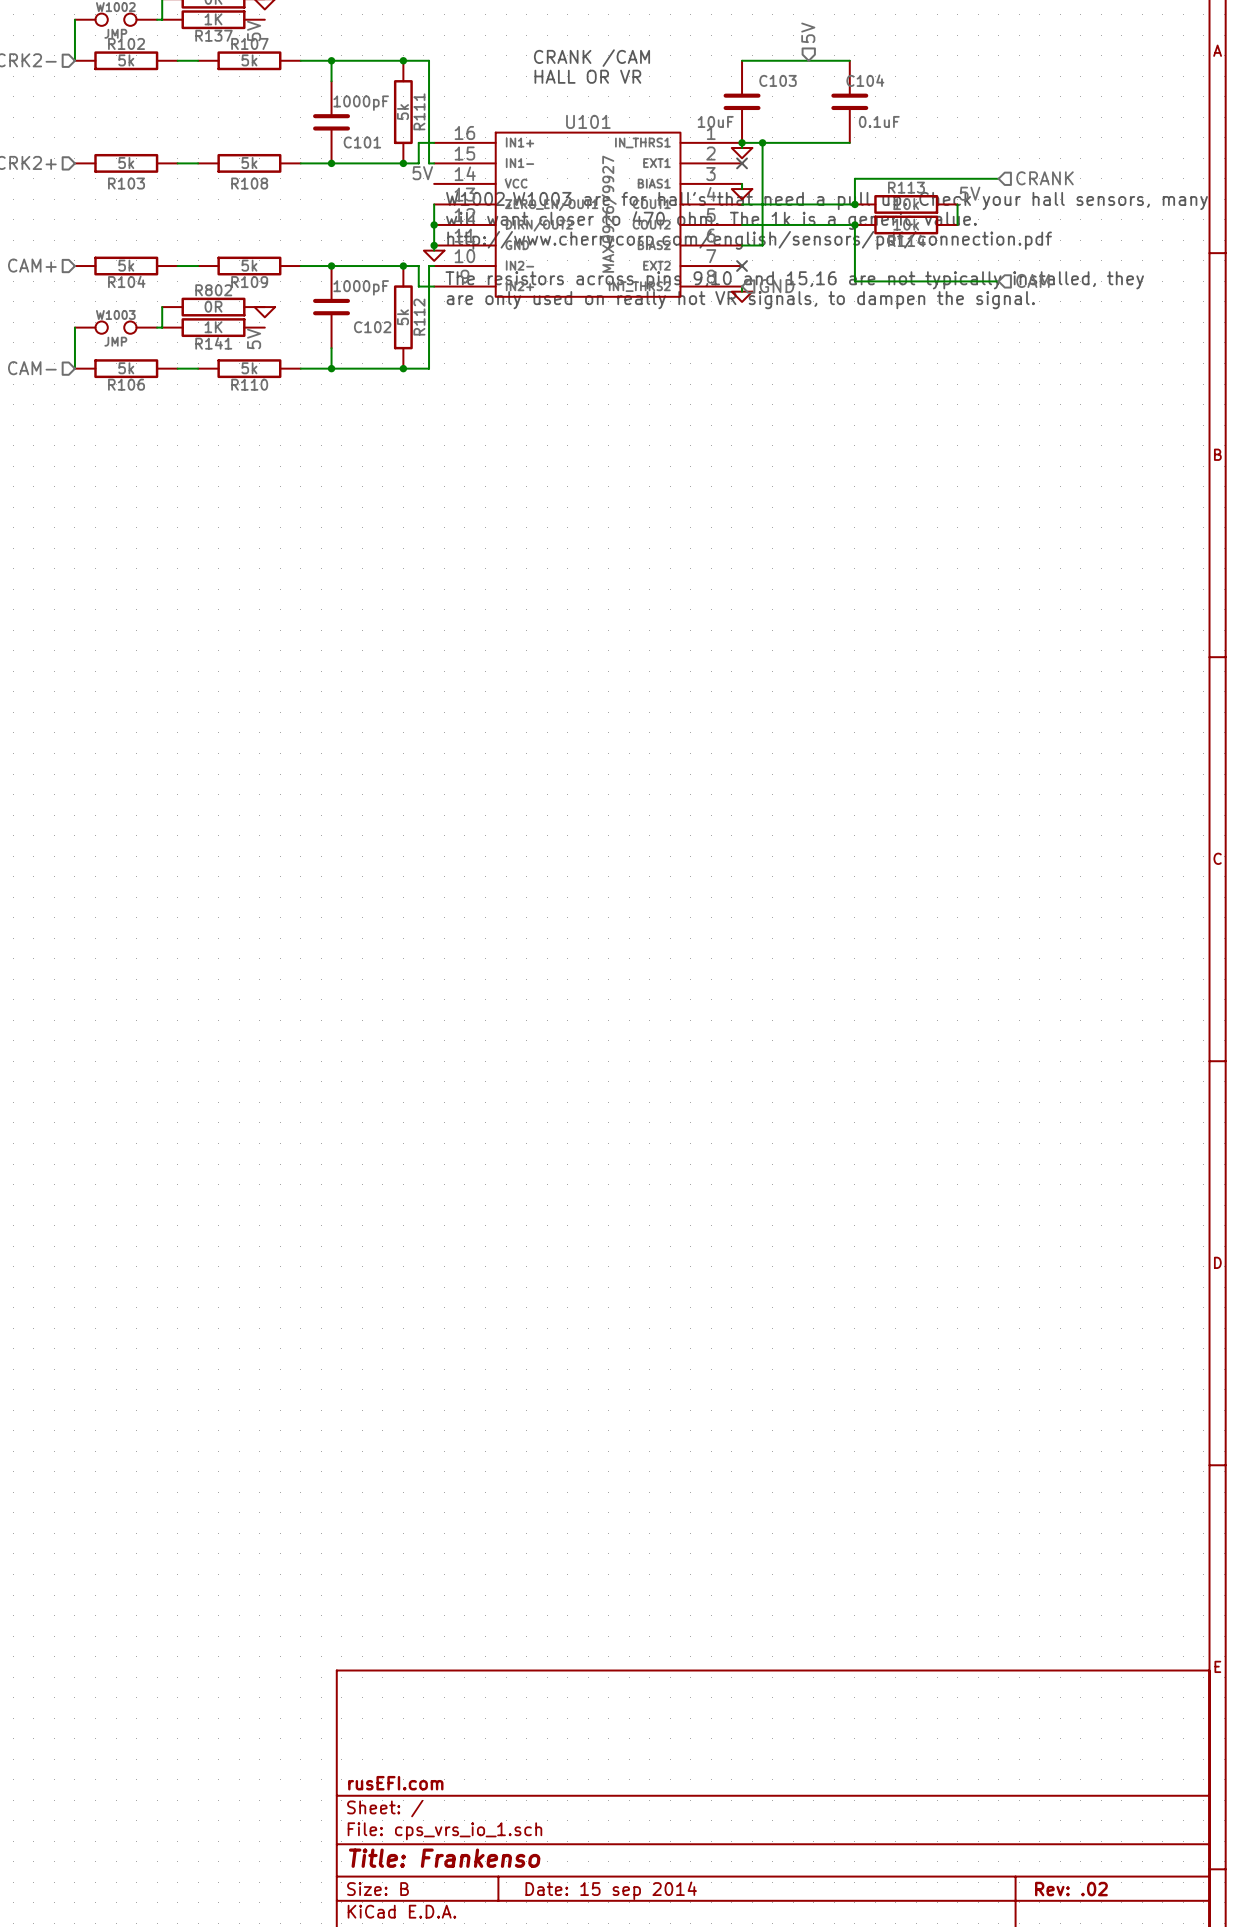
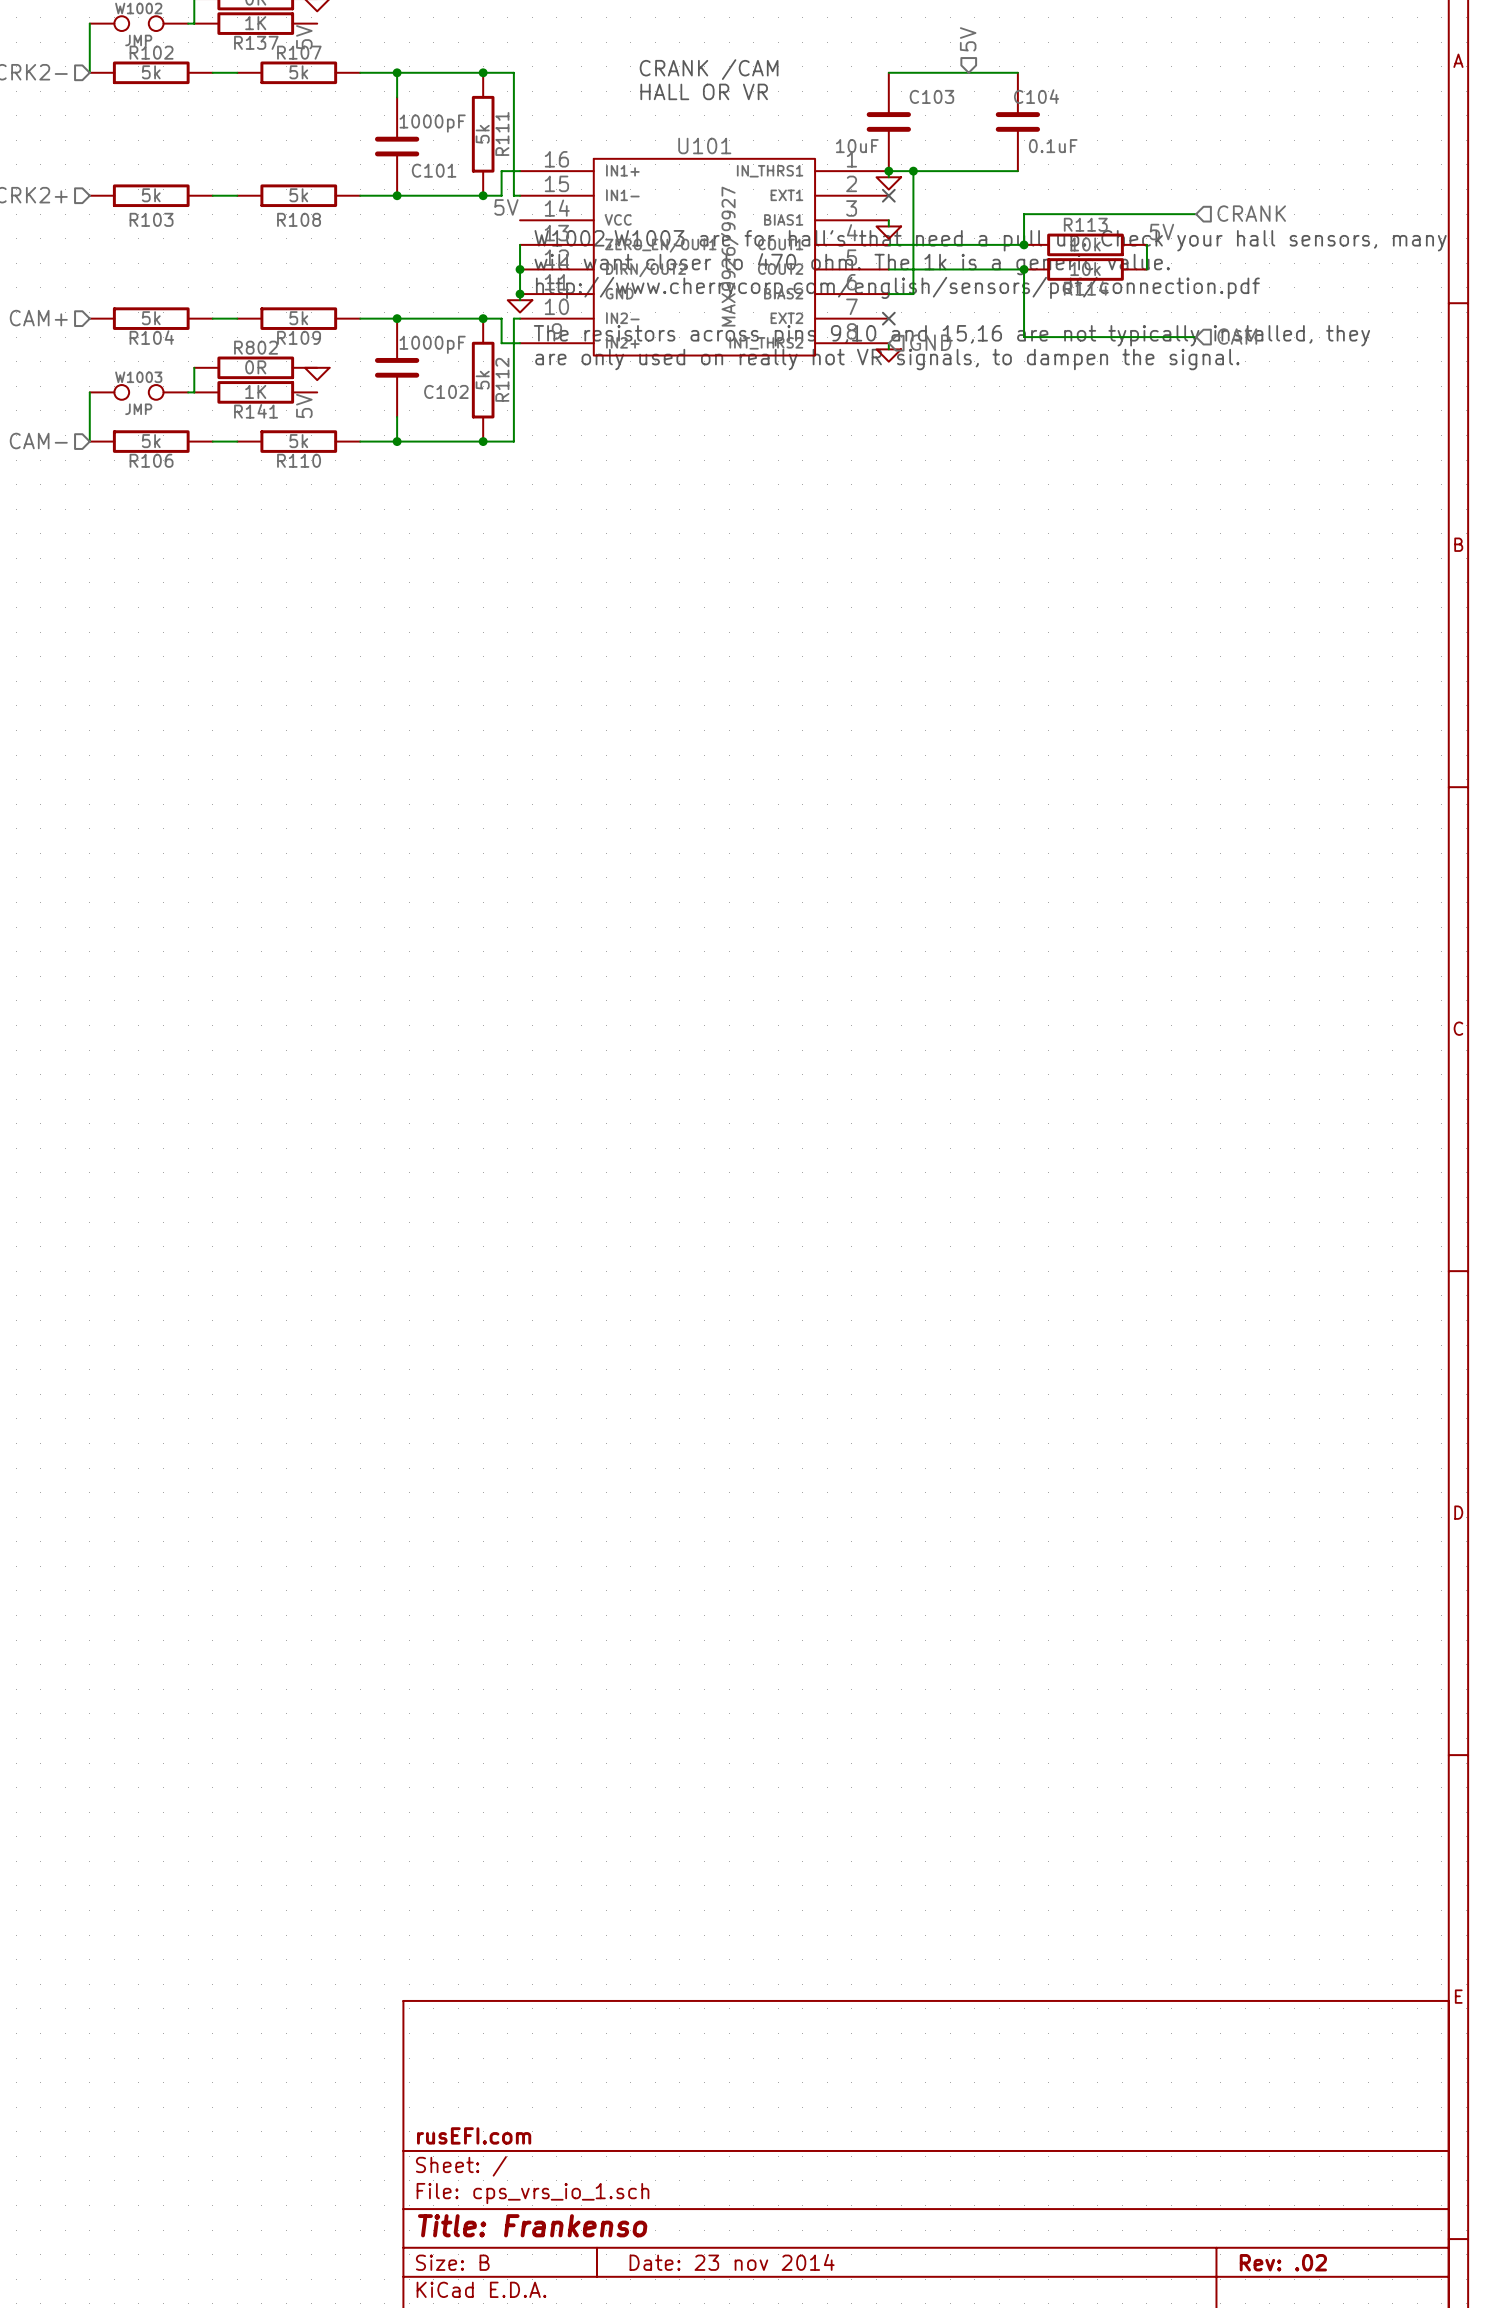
title block: Date: 15 sep 2014 (611, 1890) -> Date: 23 nov 2014 (732, 2262)

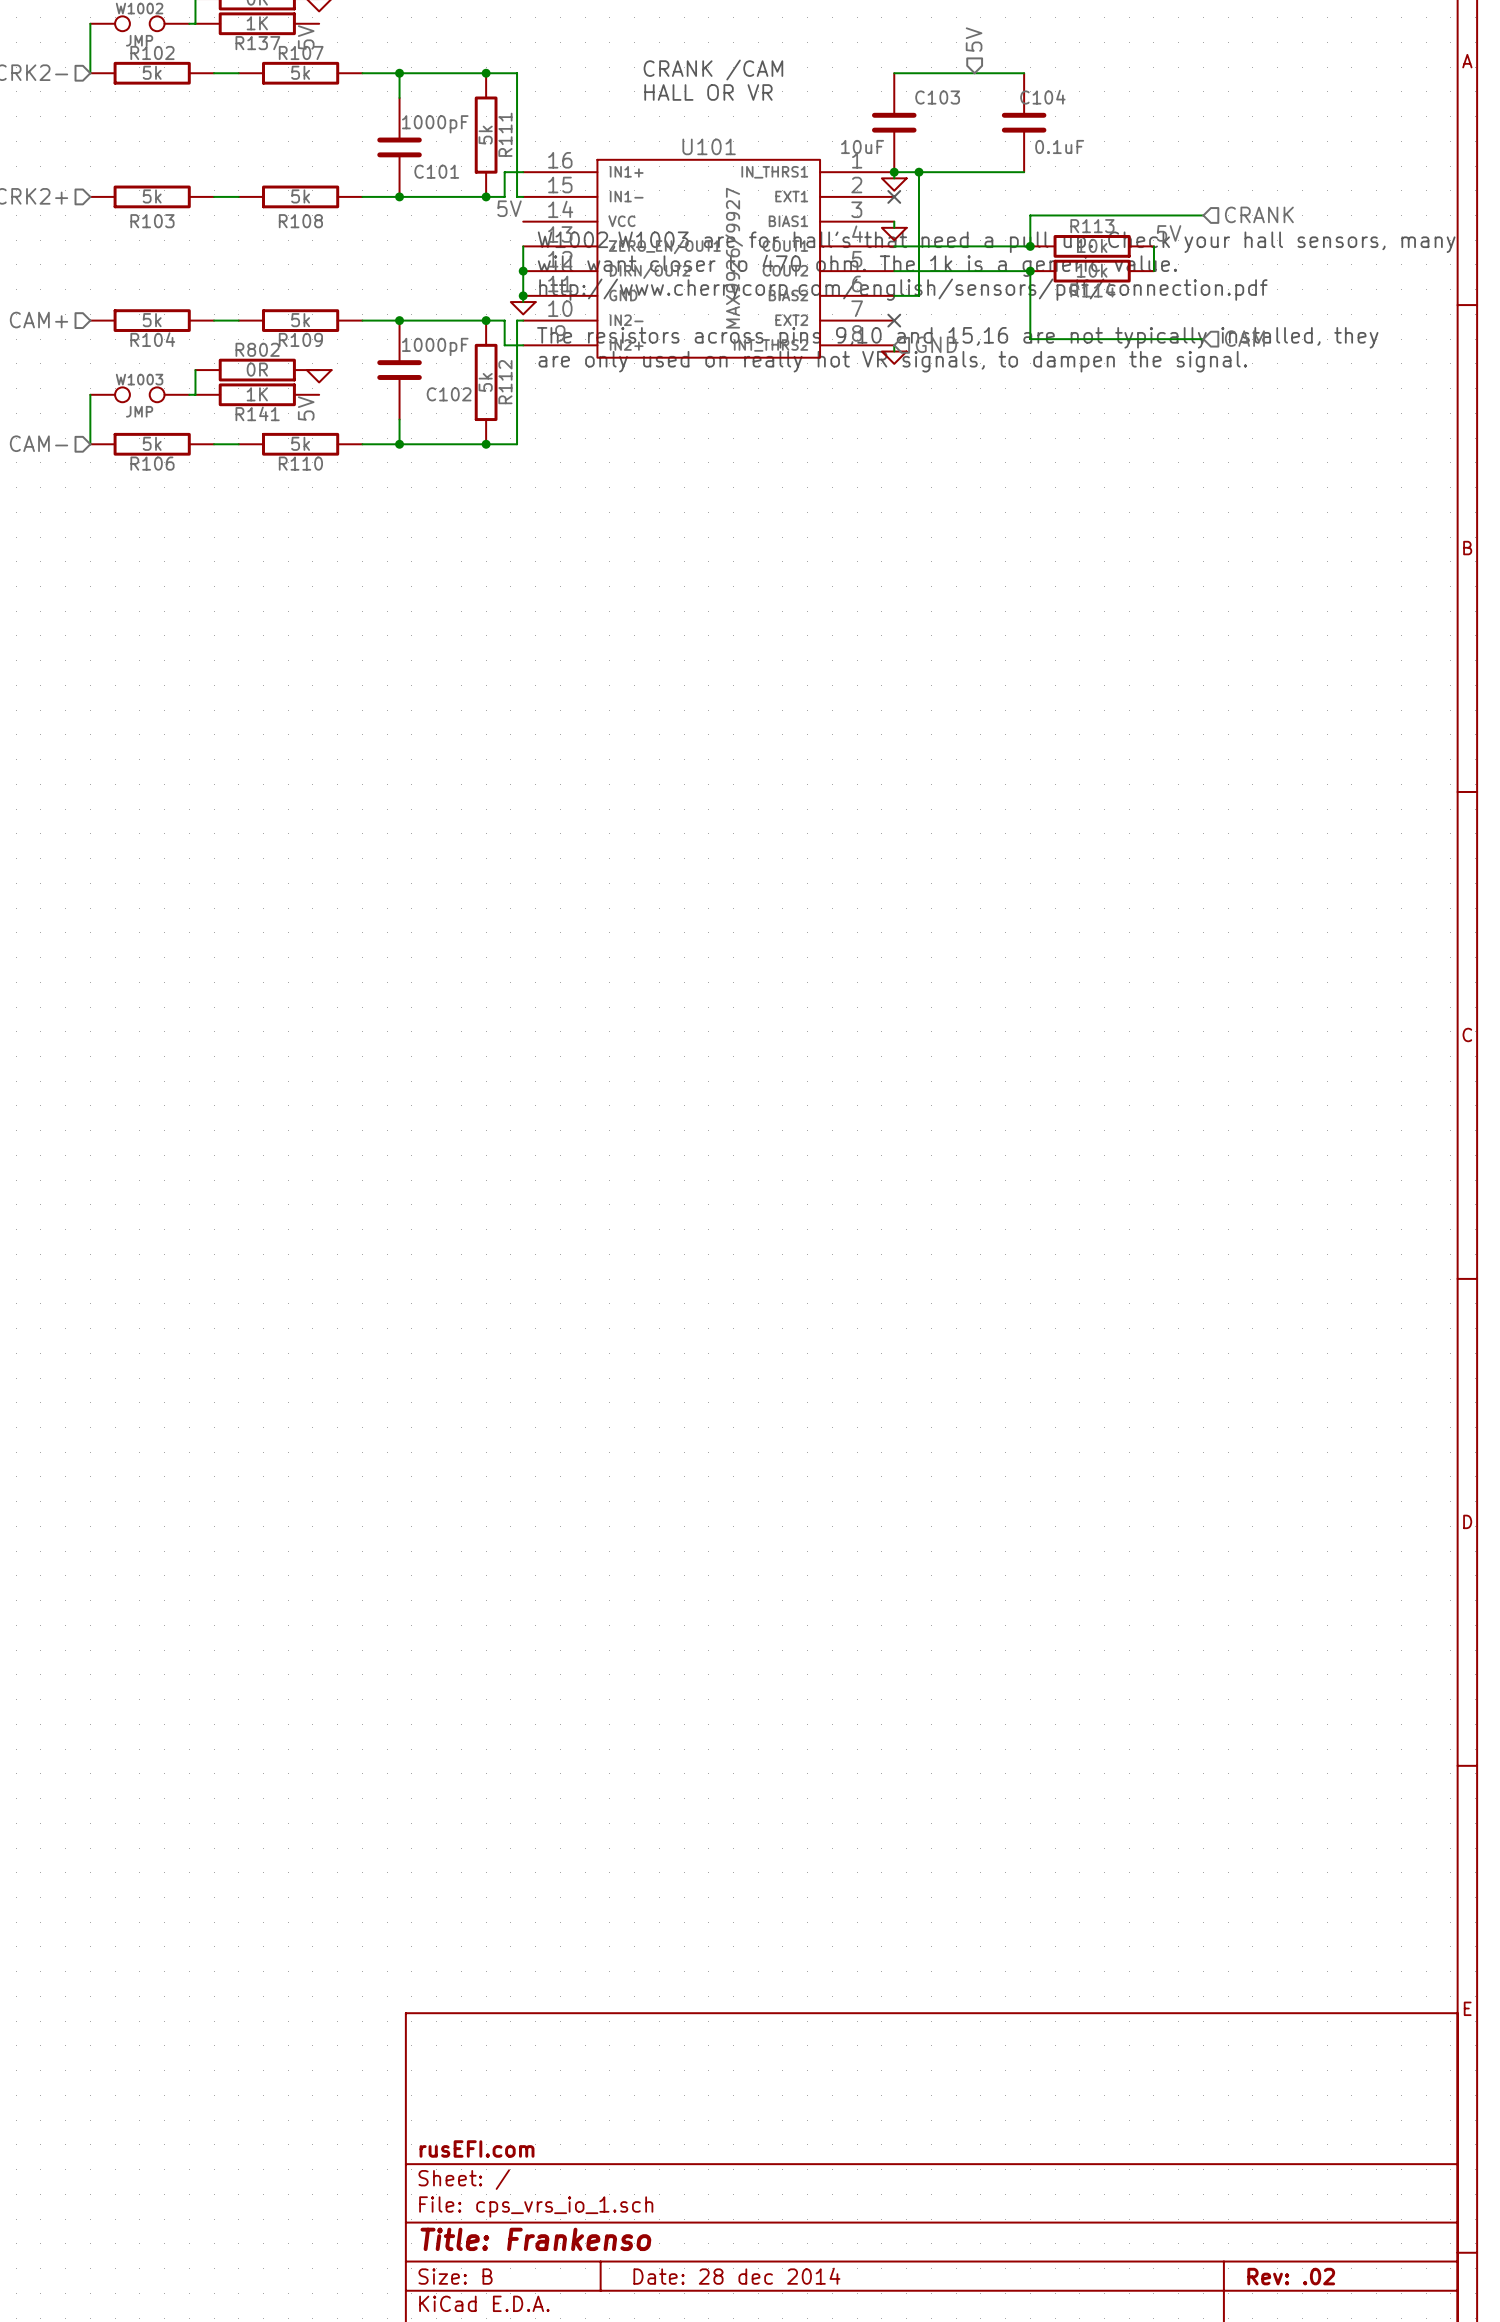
title block: Date: 23 nov 2014 (732, 2262) -> Date: 28 dec 2014 (736, 2276)

